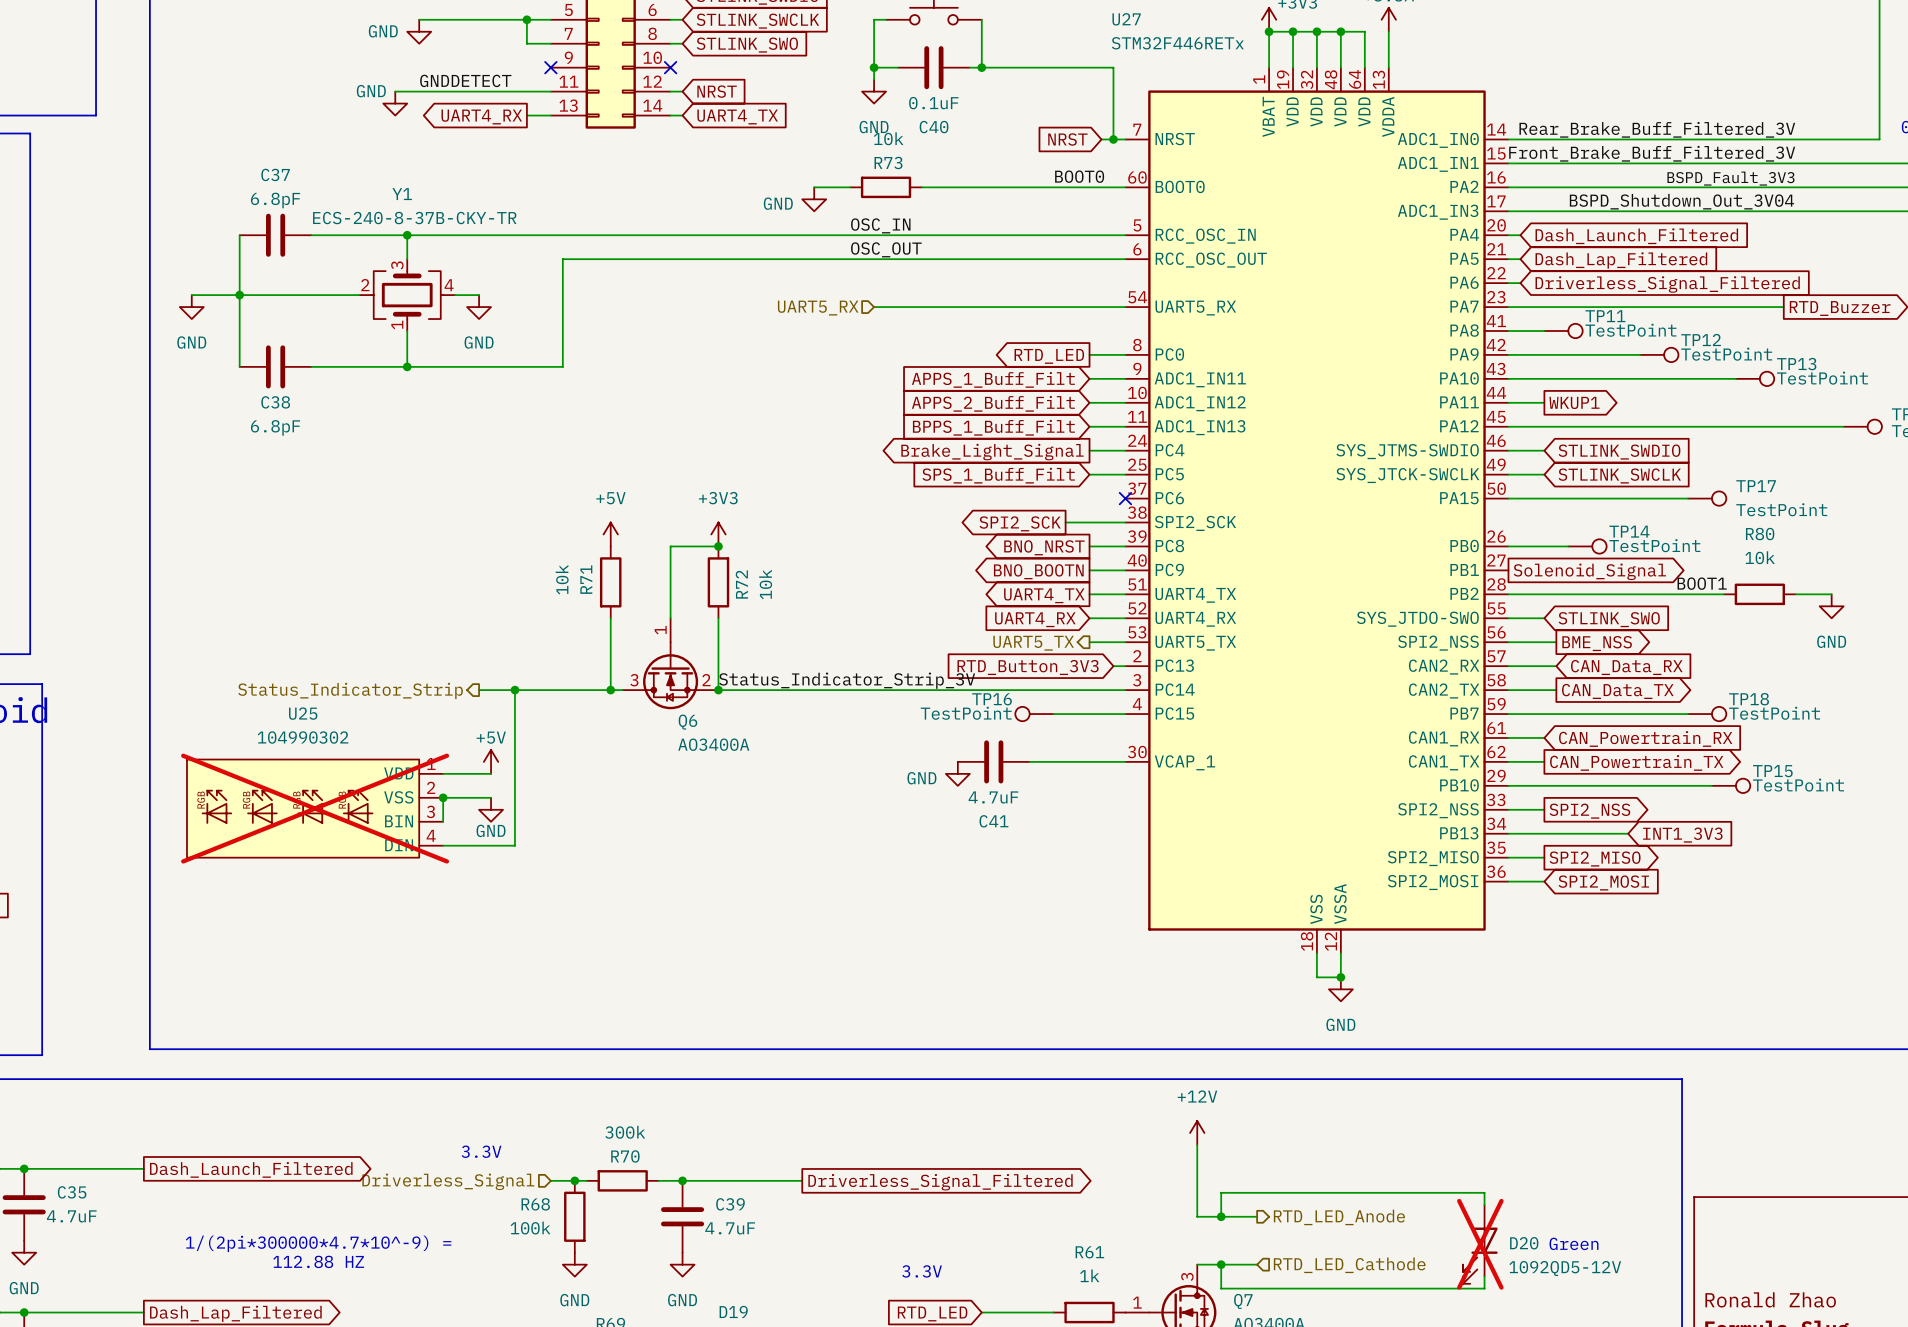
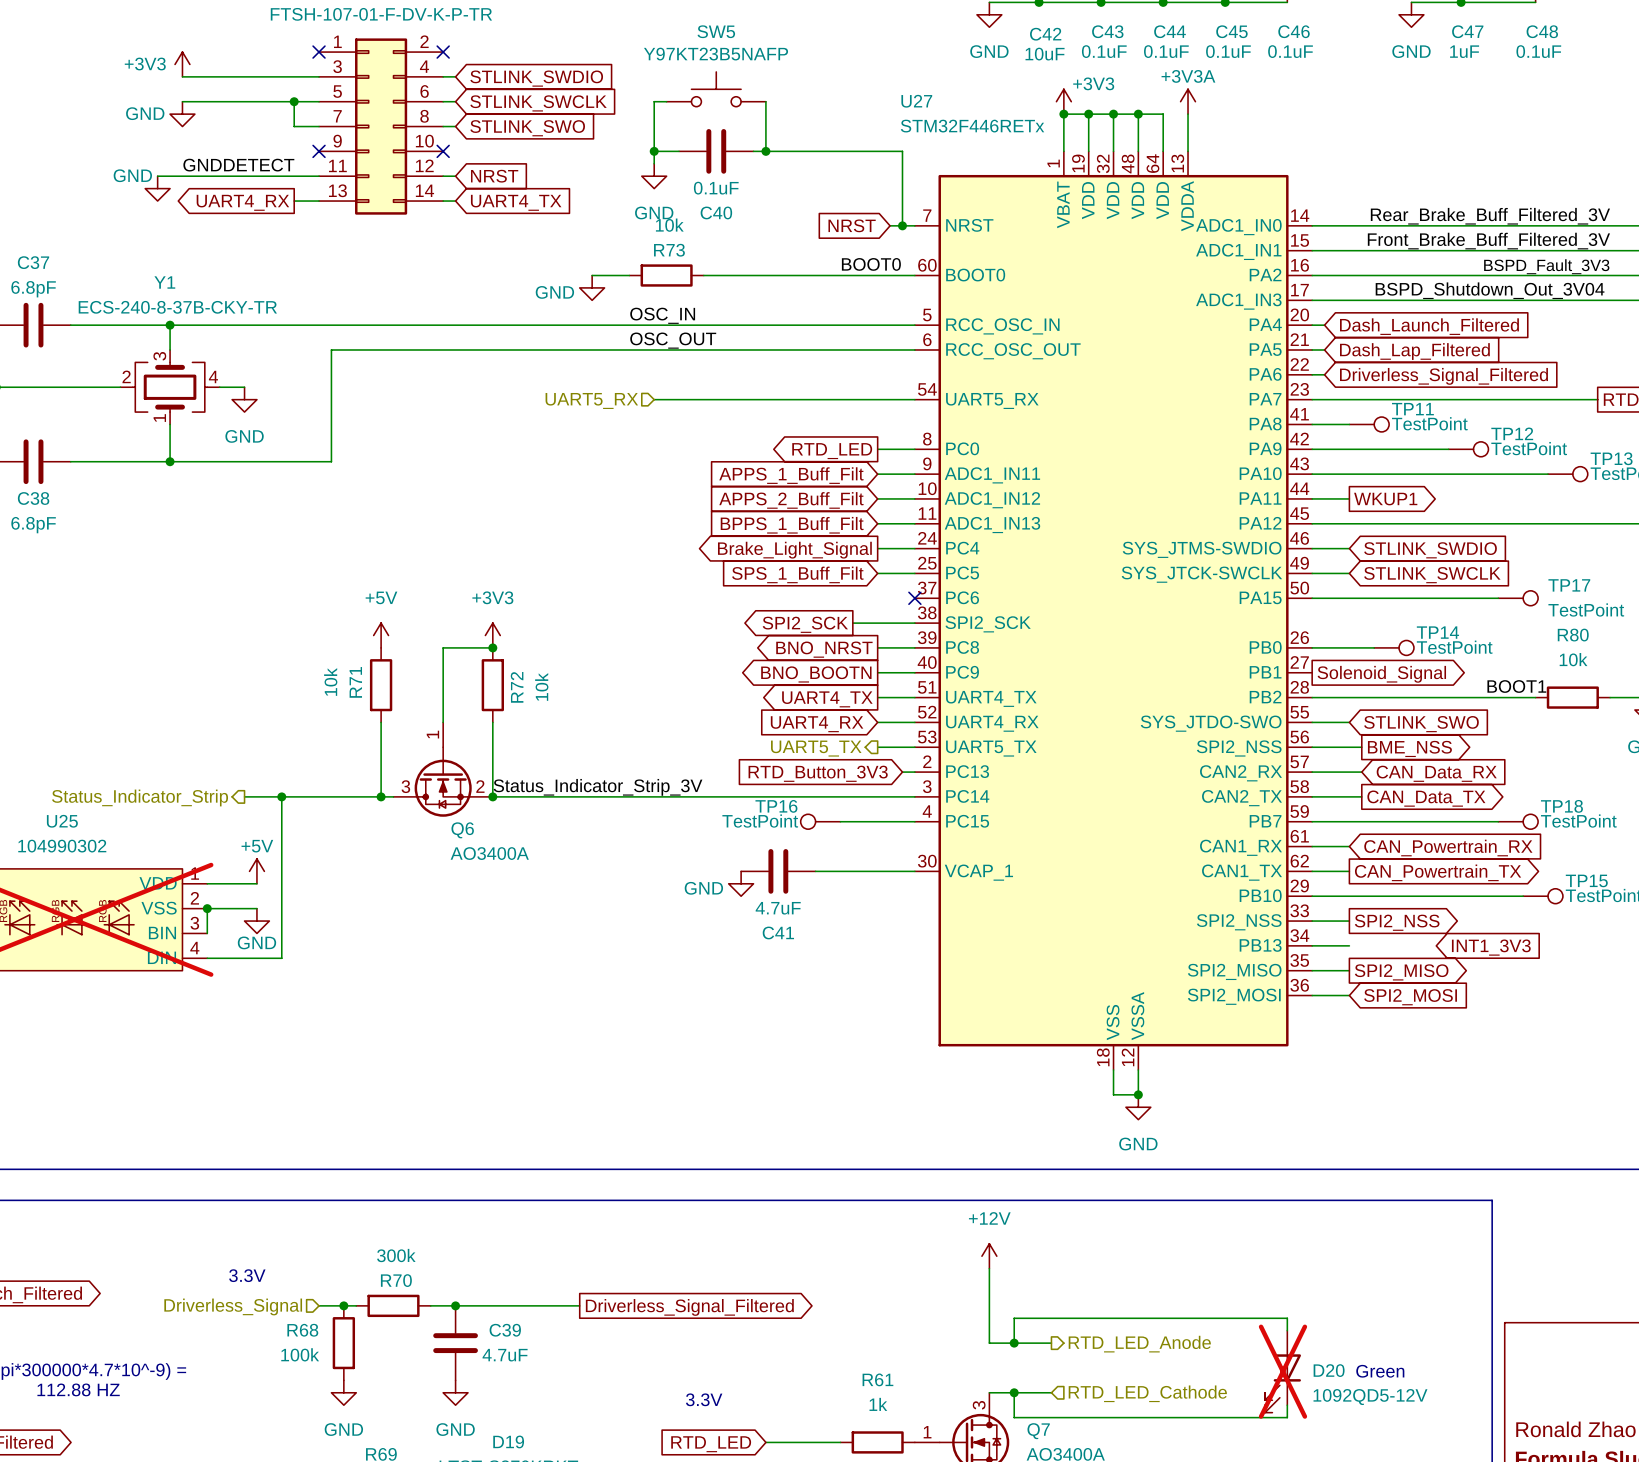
wire: (1544, 833) (1628, 833) -> none

